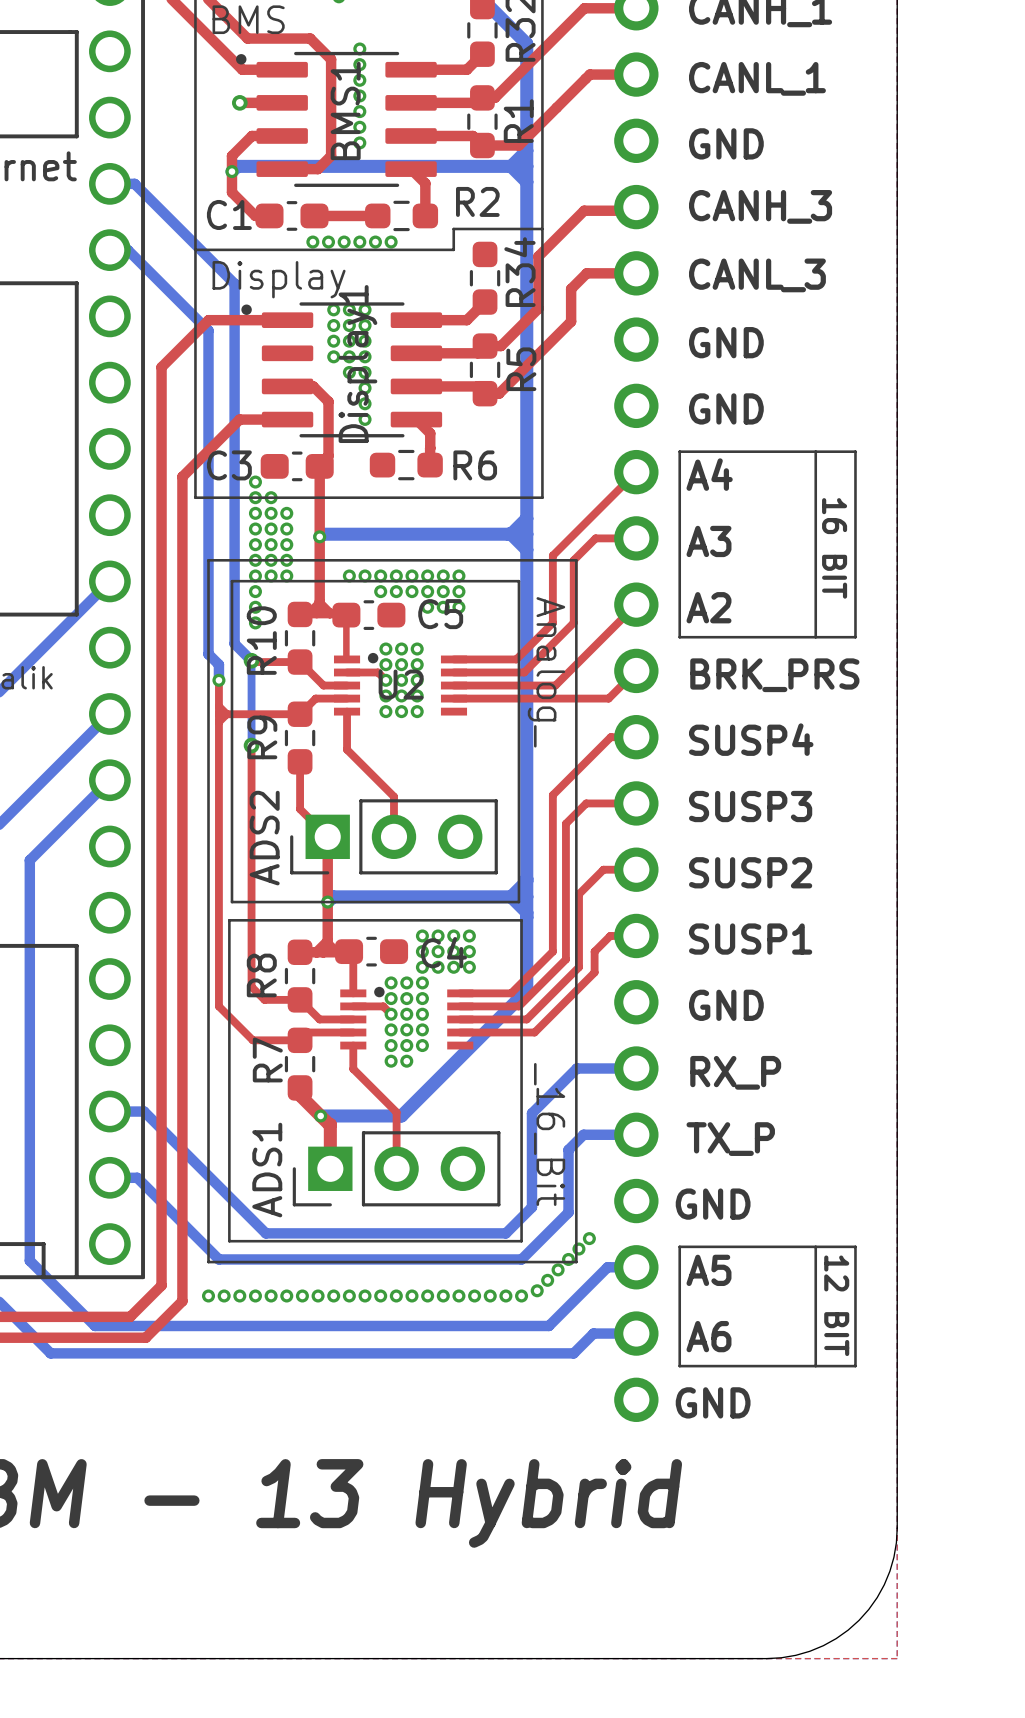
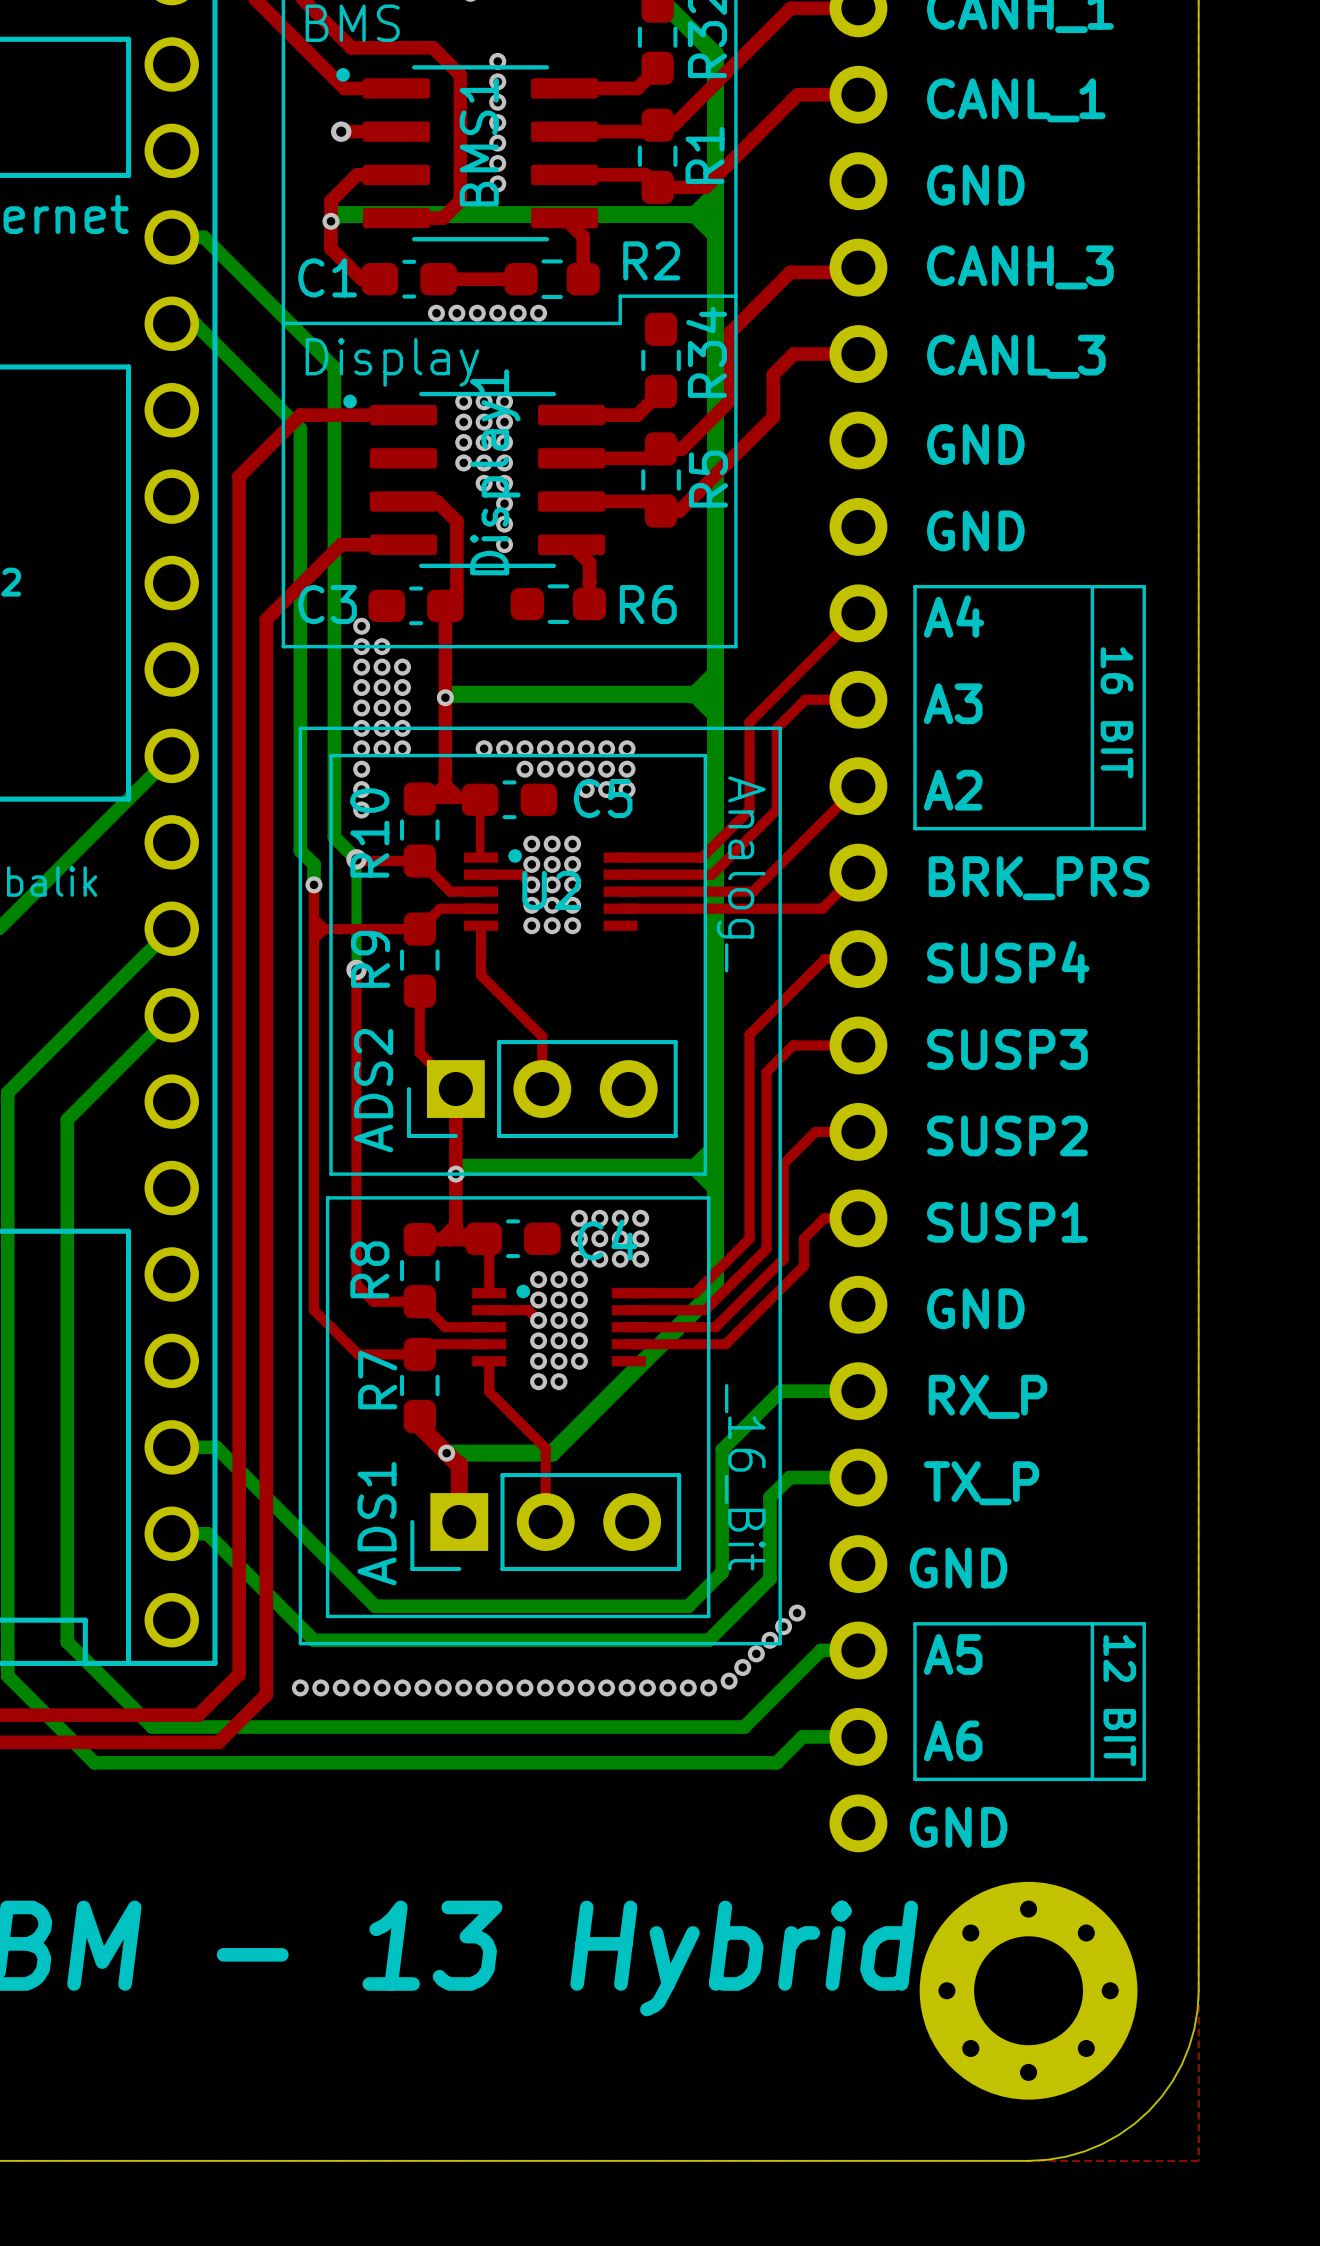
part: none -> (1028, 1990)

